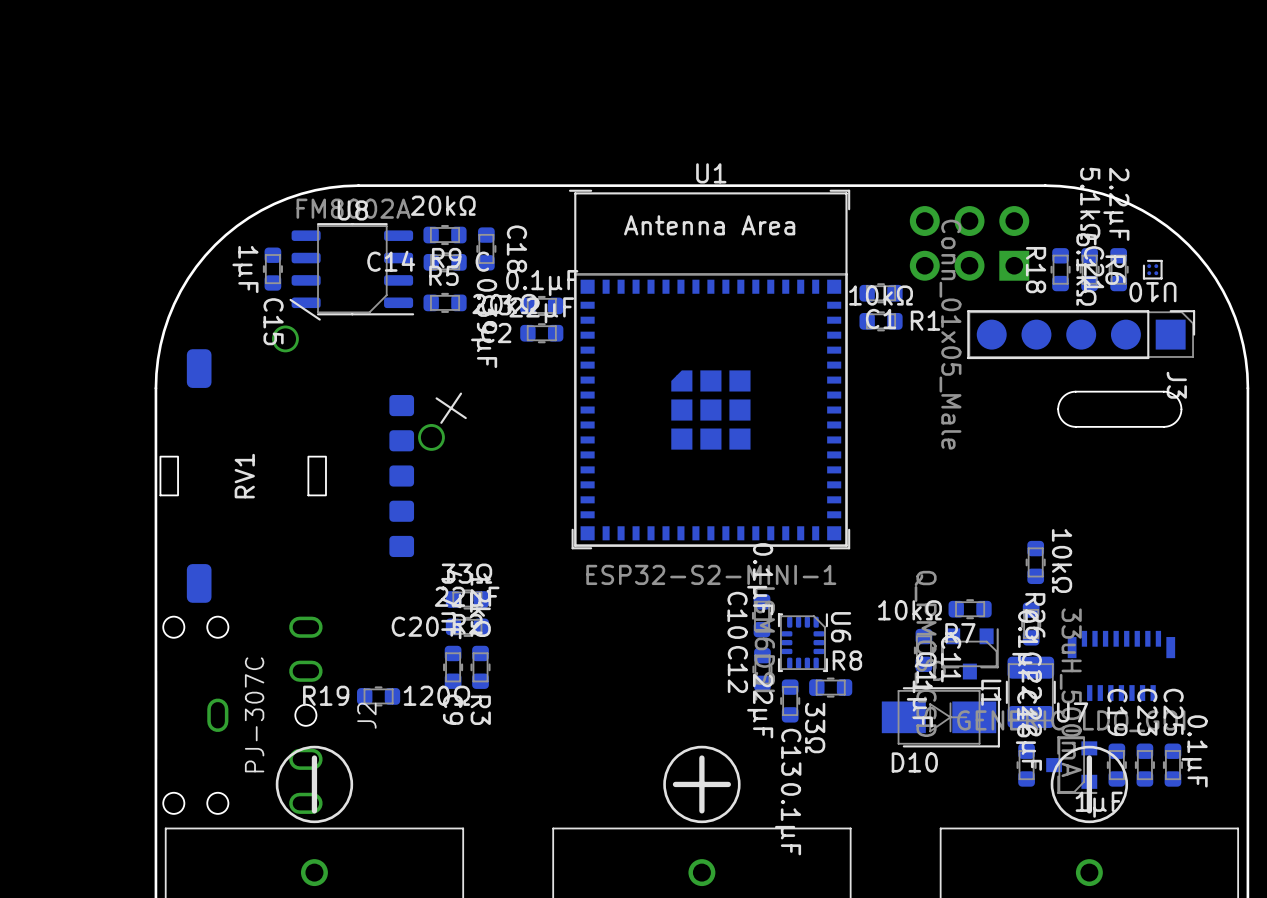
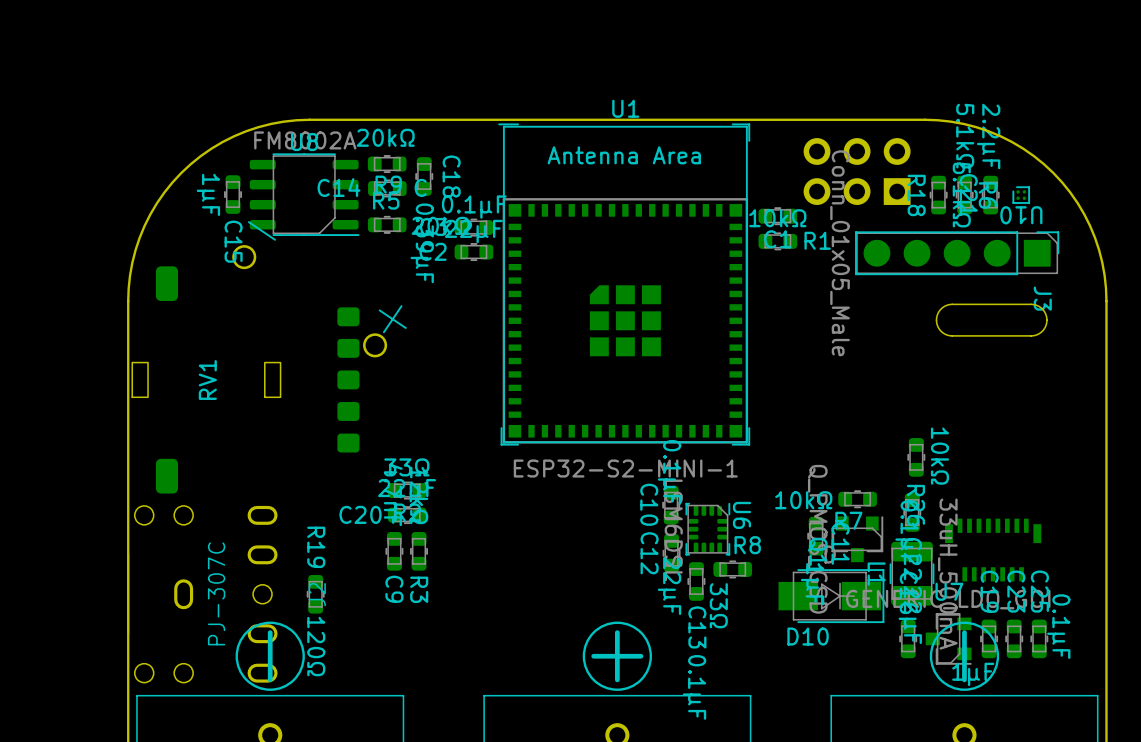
R19 rotation: 0° (378, 696) -> 90° clockwise (315, 594)

